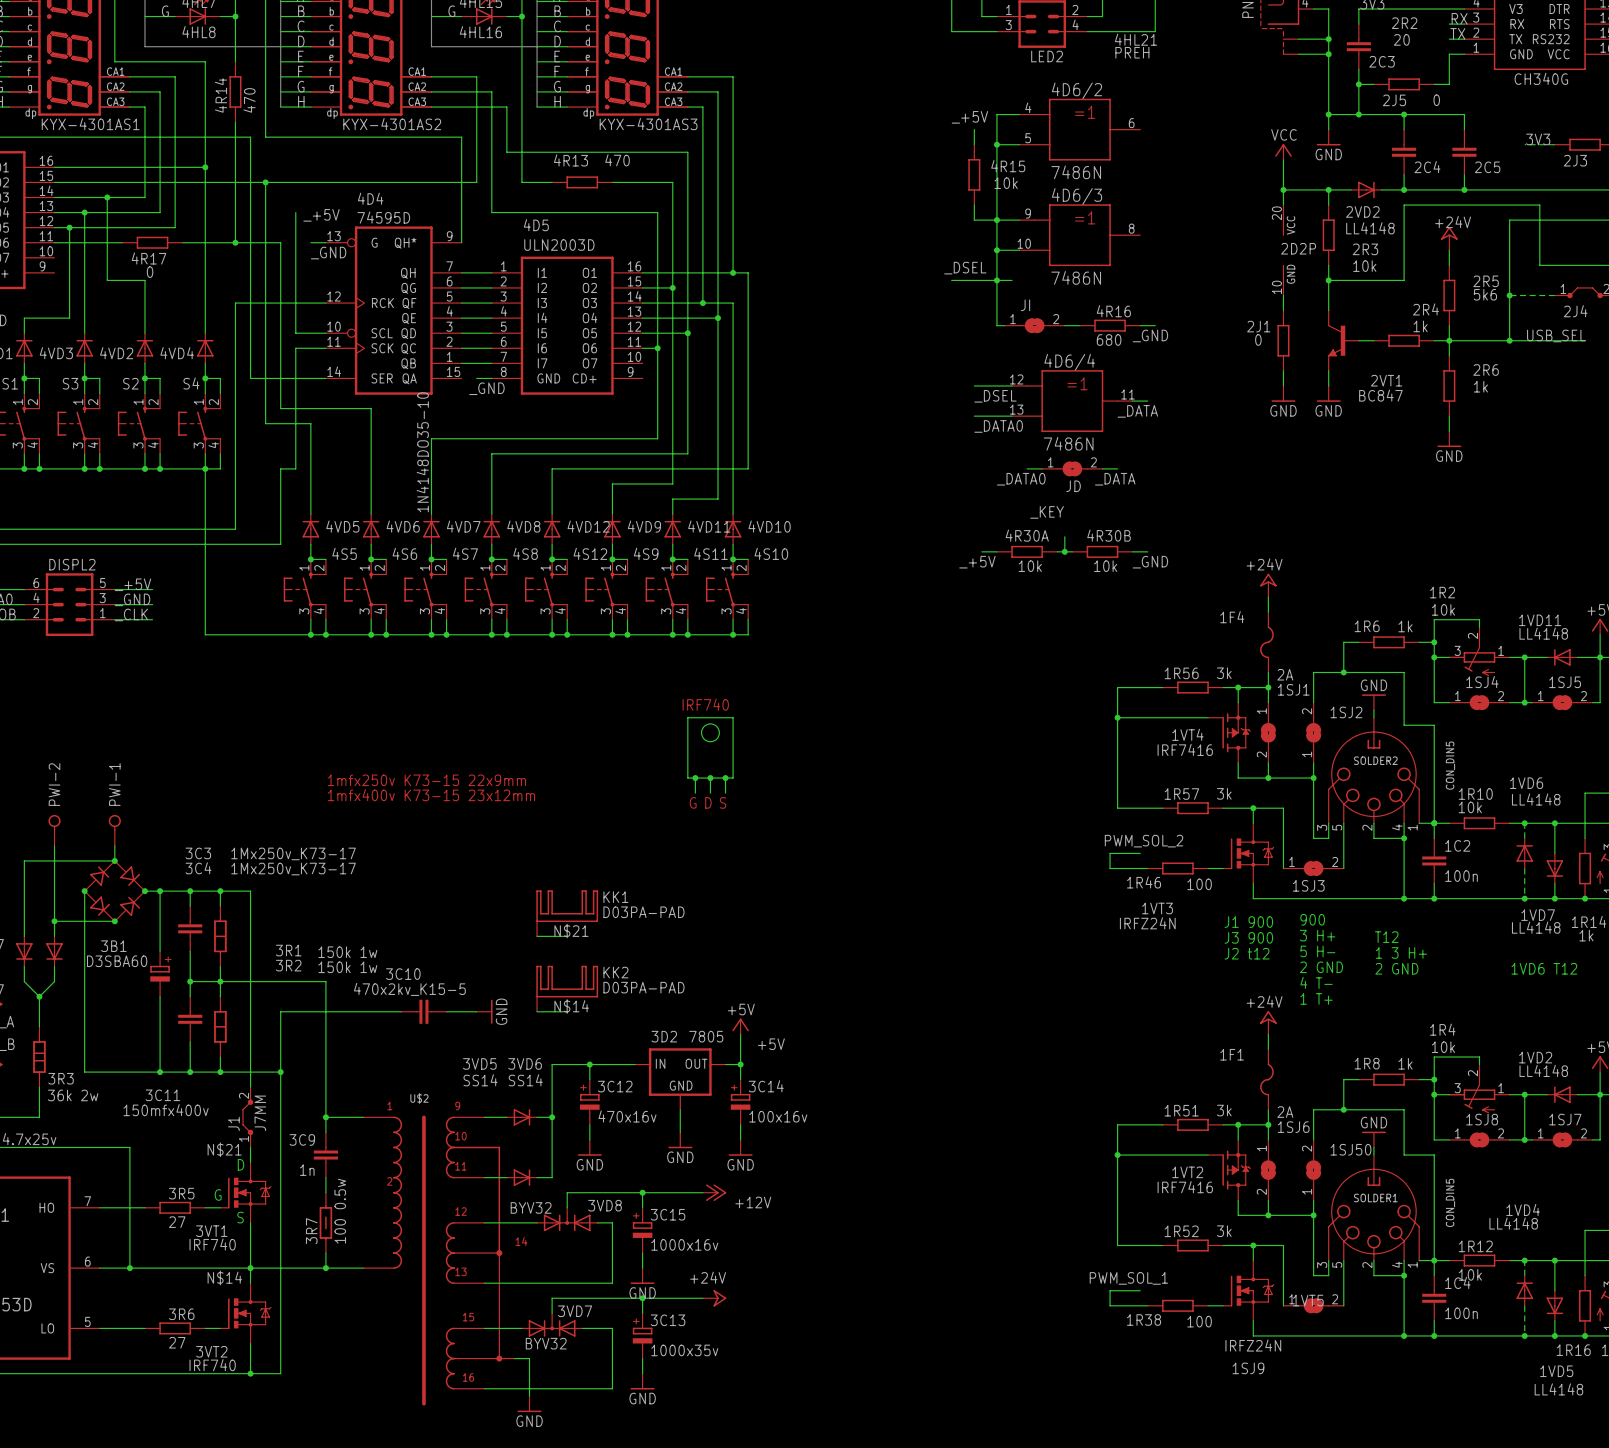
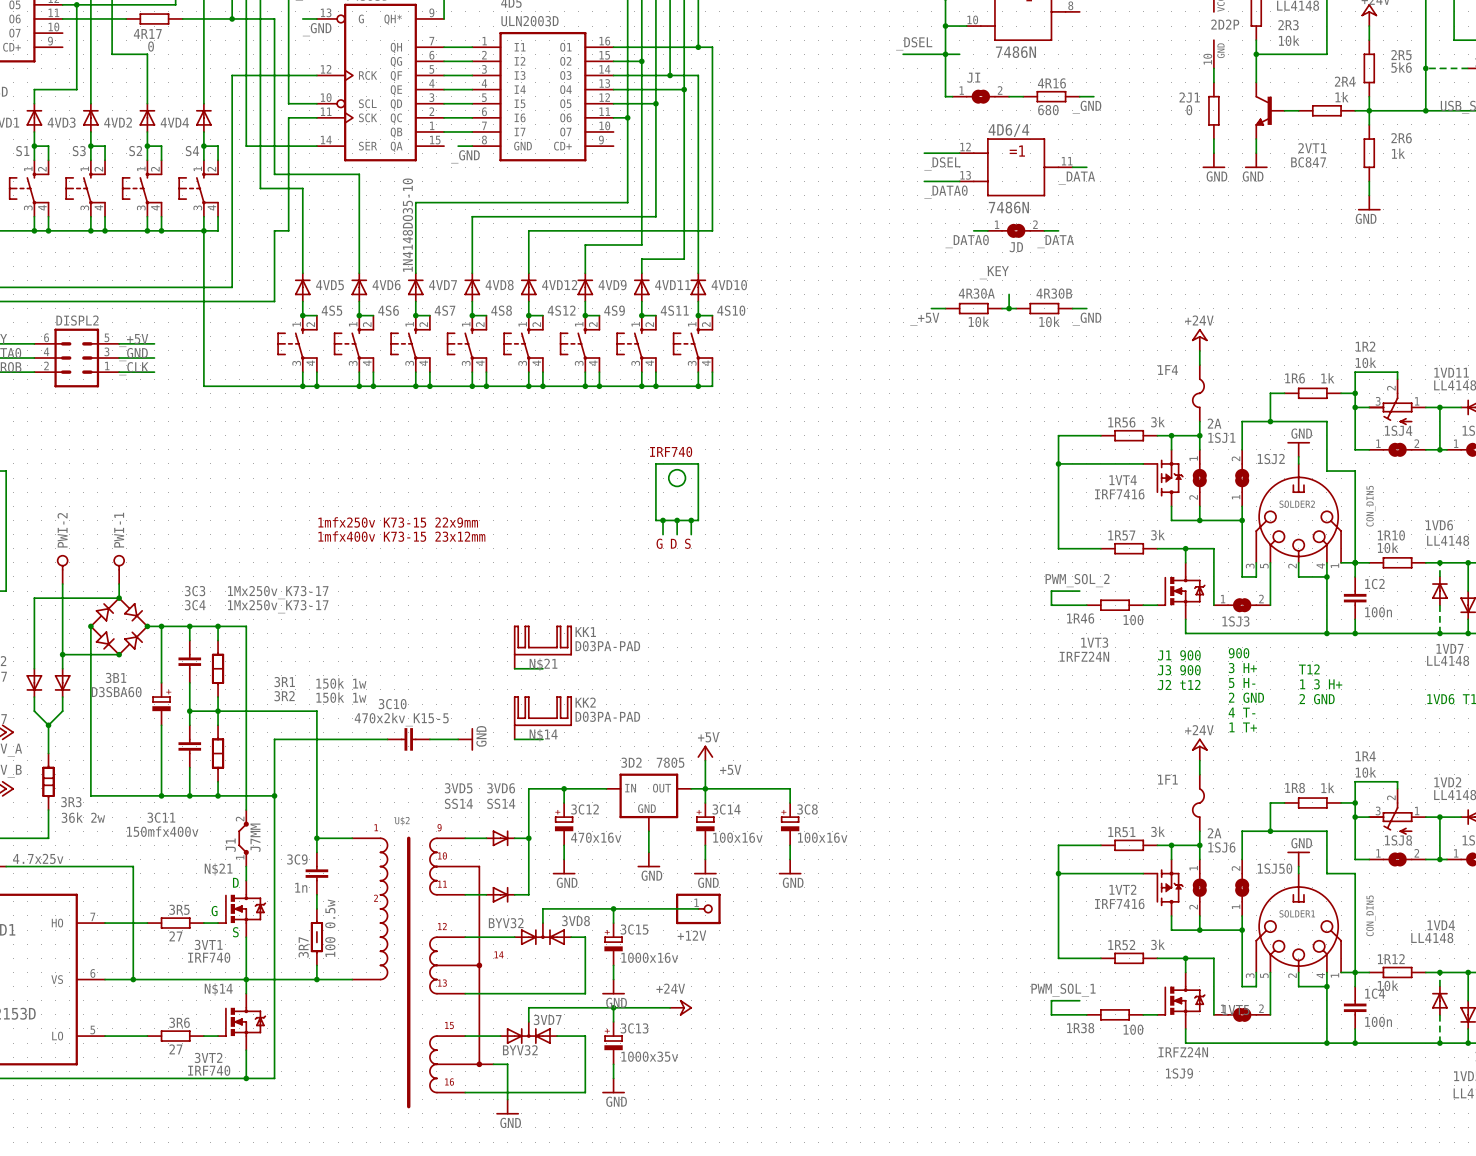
wire: none -> (705, 788) (790, 788) (790, 802)
3C8: none -> 100x16v (790, 824)
wire: none -> (790, 845) (790, 859)
power symbol: none -> GND (790, 866)
power symbol: +12V (714, 1192) -> none
+12V: none -> (698, 908)

